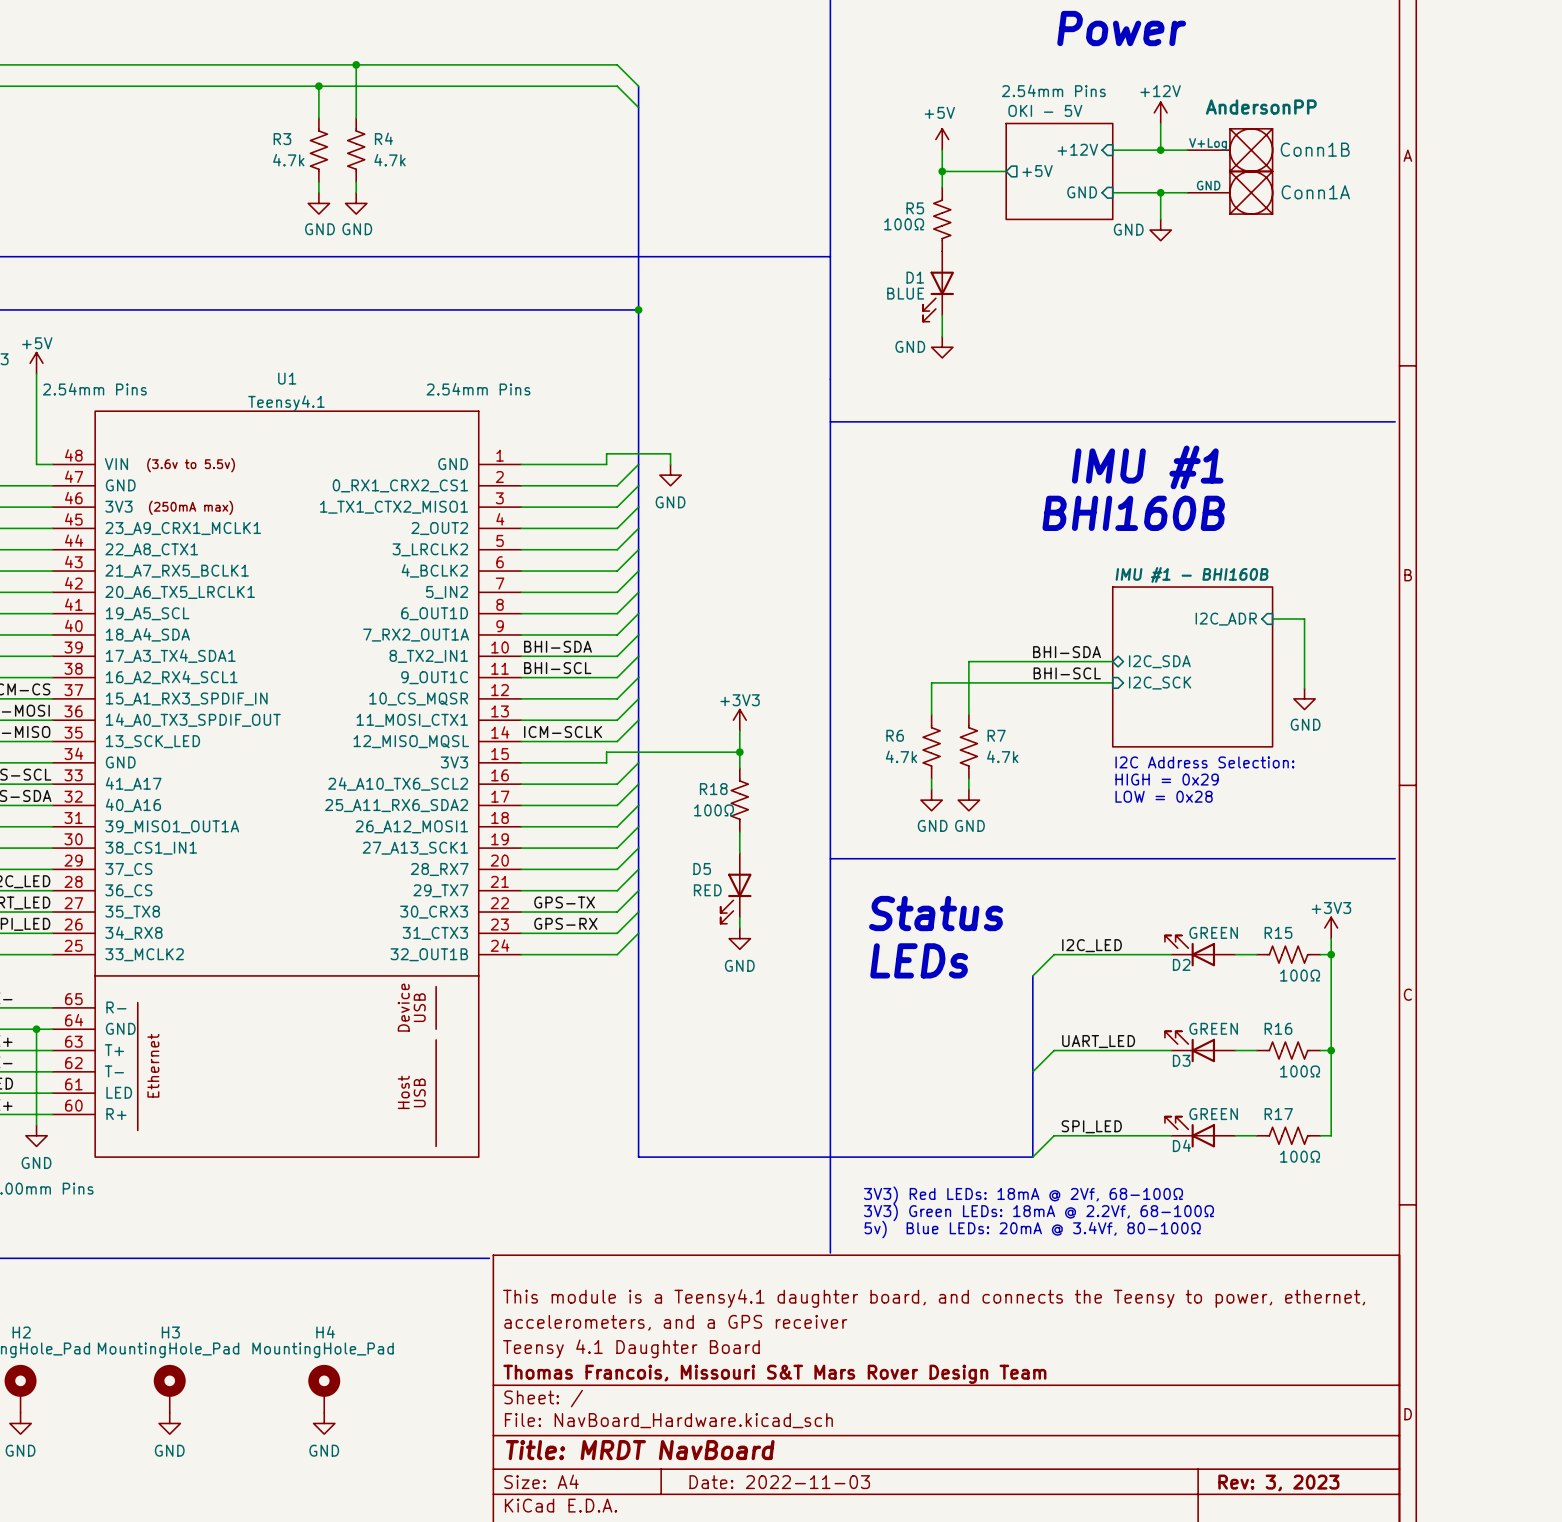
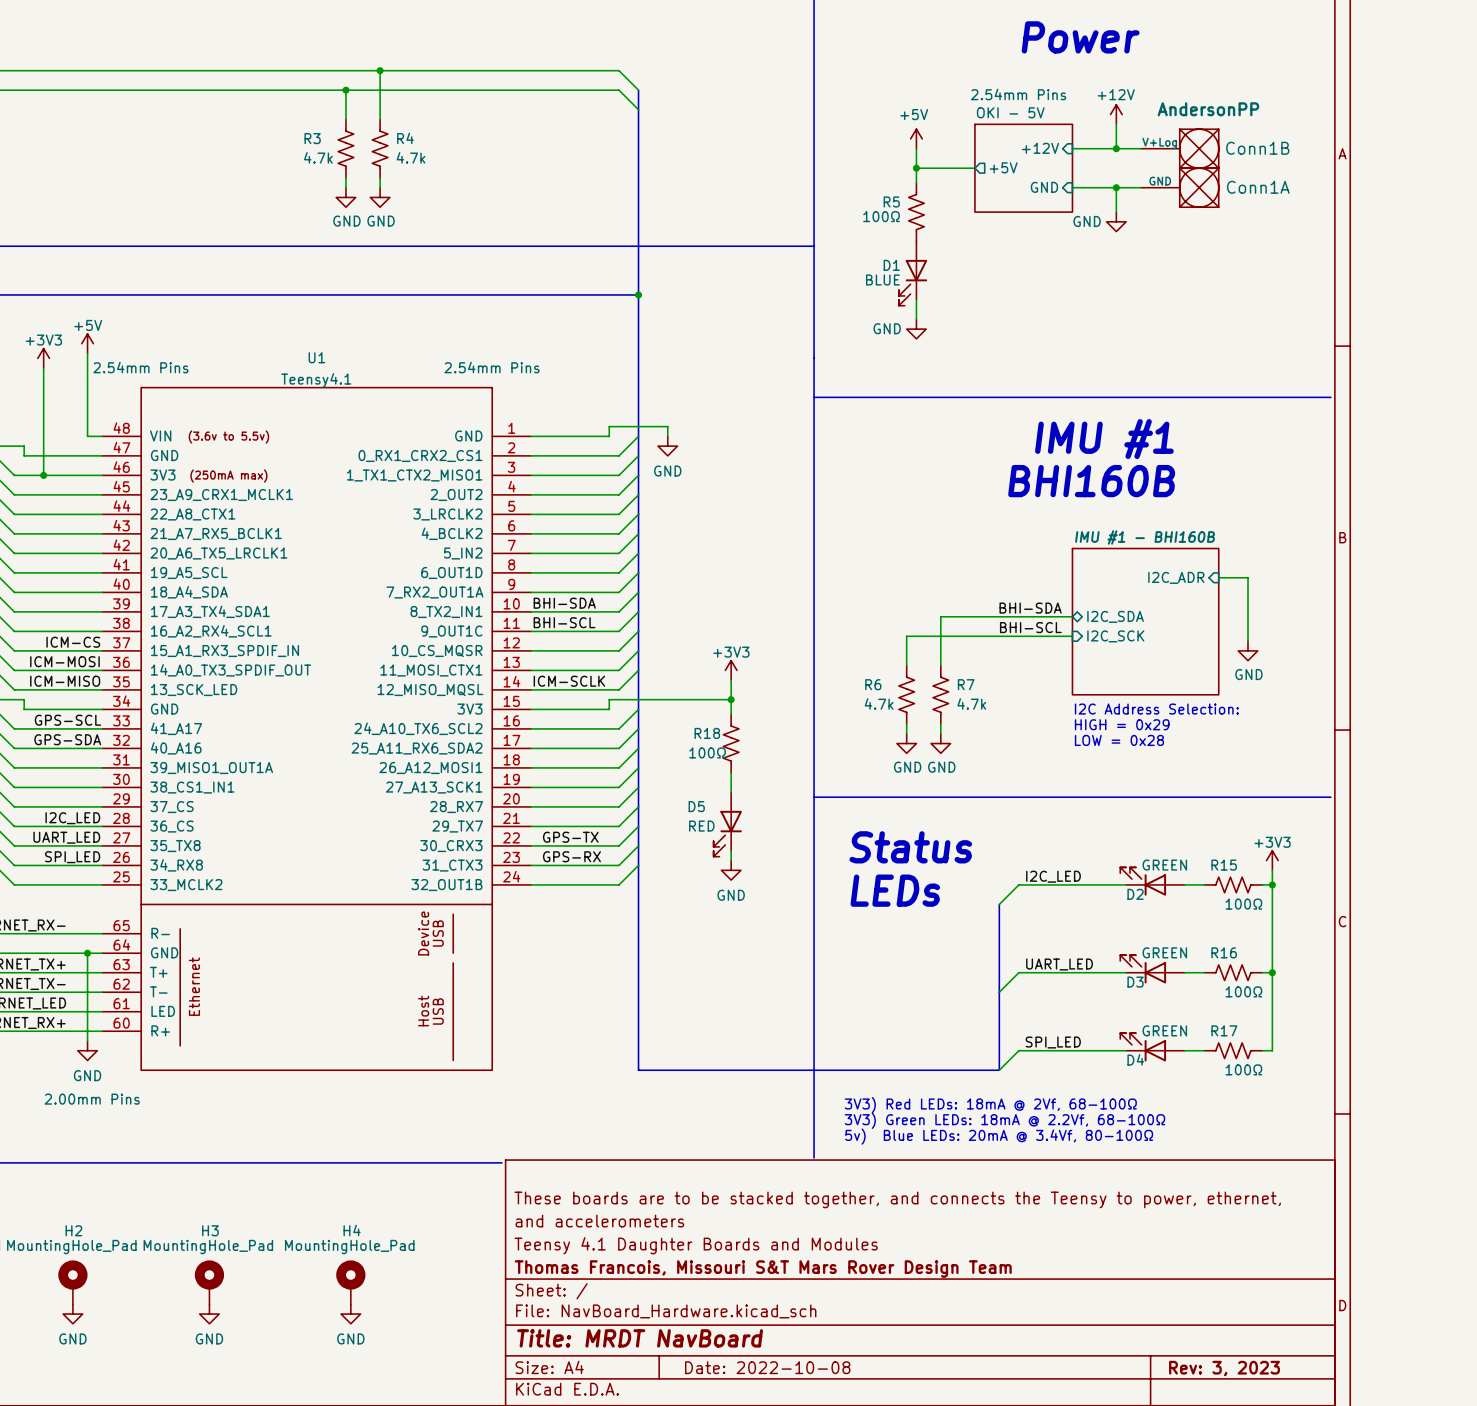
title block: This module is a Teensy4.1 daughter board, and connects the Teensy to power, ethernet, (934, 1298) -> These boards are to be stacked together, and connects the Teensy to power, ethernet, (897, 1199)
title block: accelerometers, and a GPS receiver (675, 1322) -> and accelerometers (599, 1221)
title block: Teensy 4.1 Daughter Board (631, 1348) -> Teensy 4.1 Daughter Boards and Modules (696, 1245)
title block: Date: 2022-11-03 (779, 1482) -> Date: 2022-10-08 (767, 1367)

